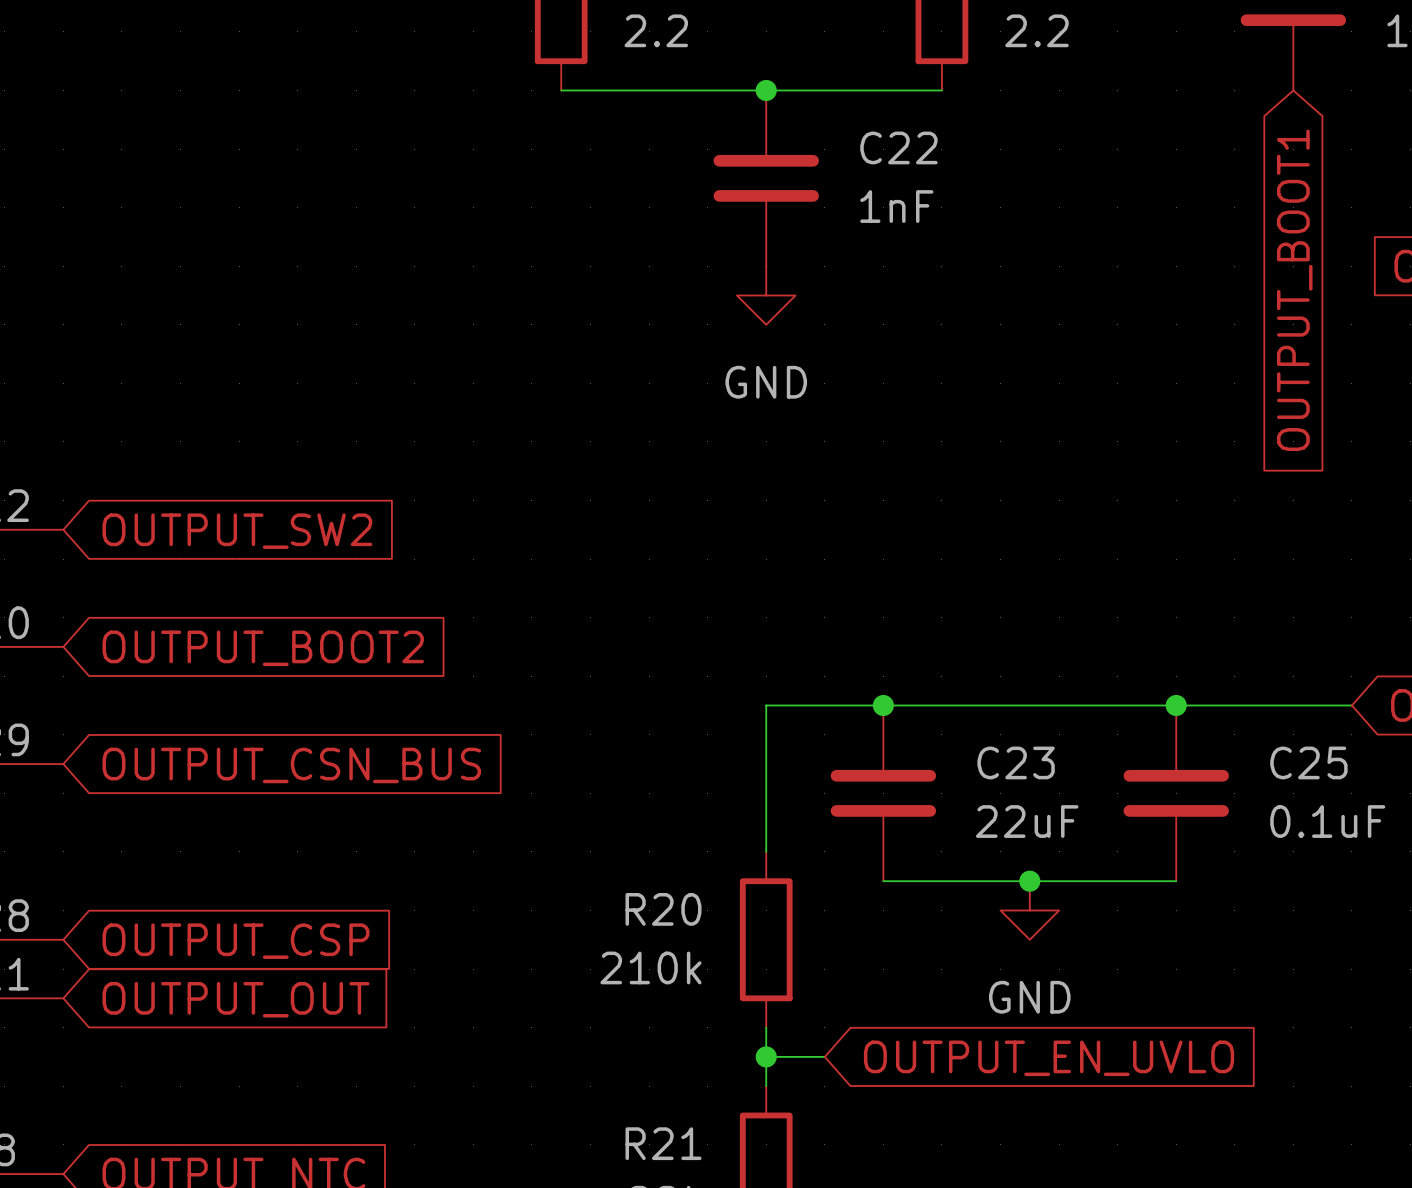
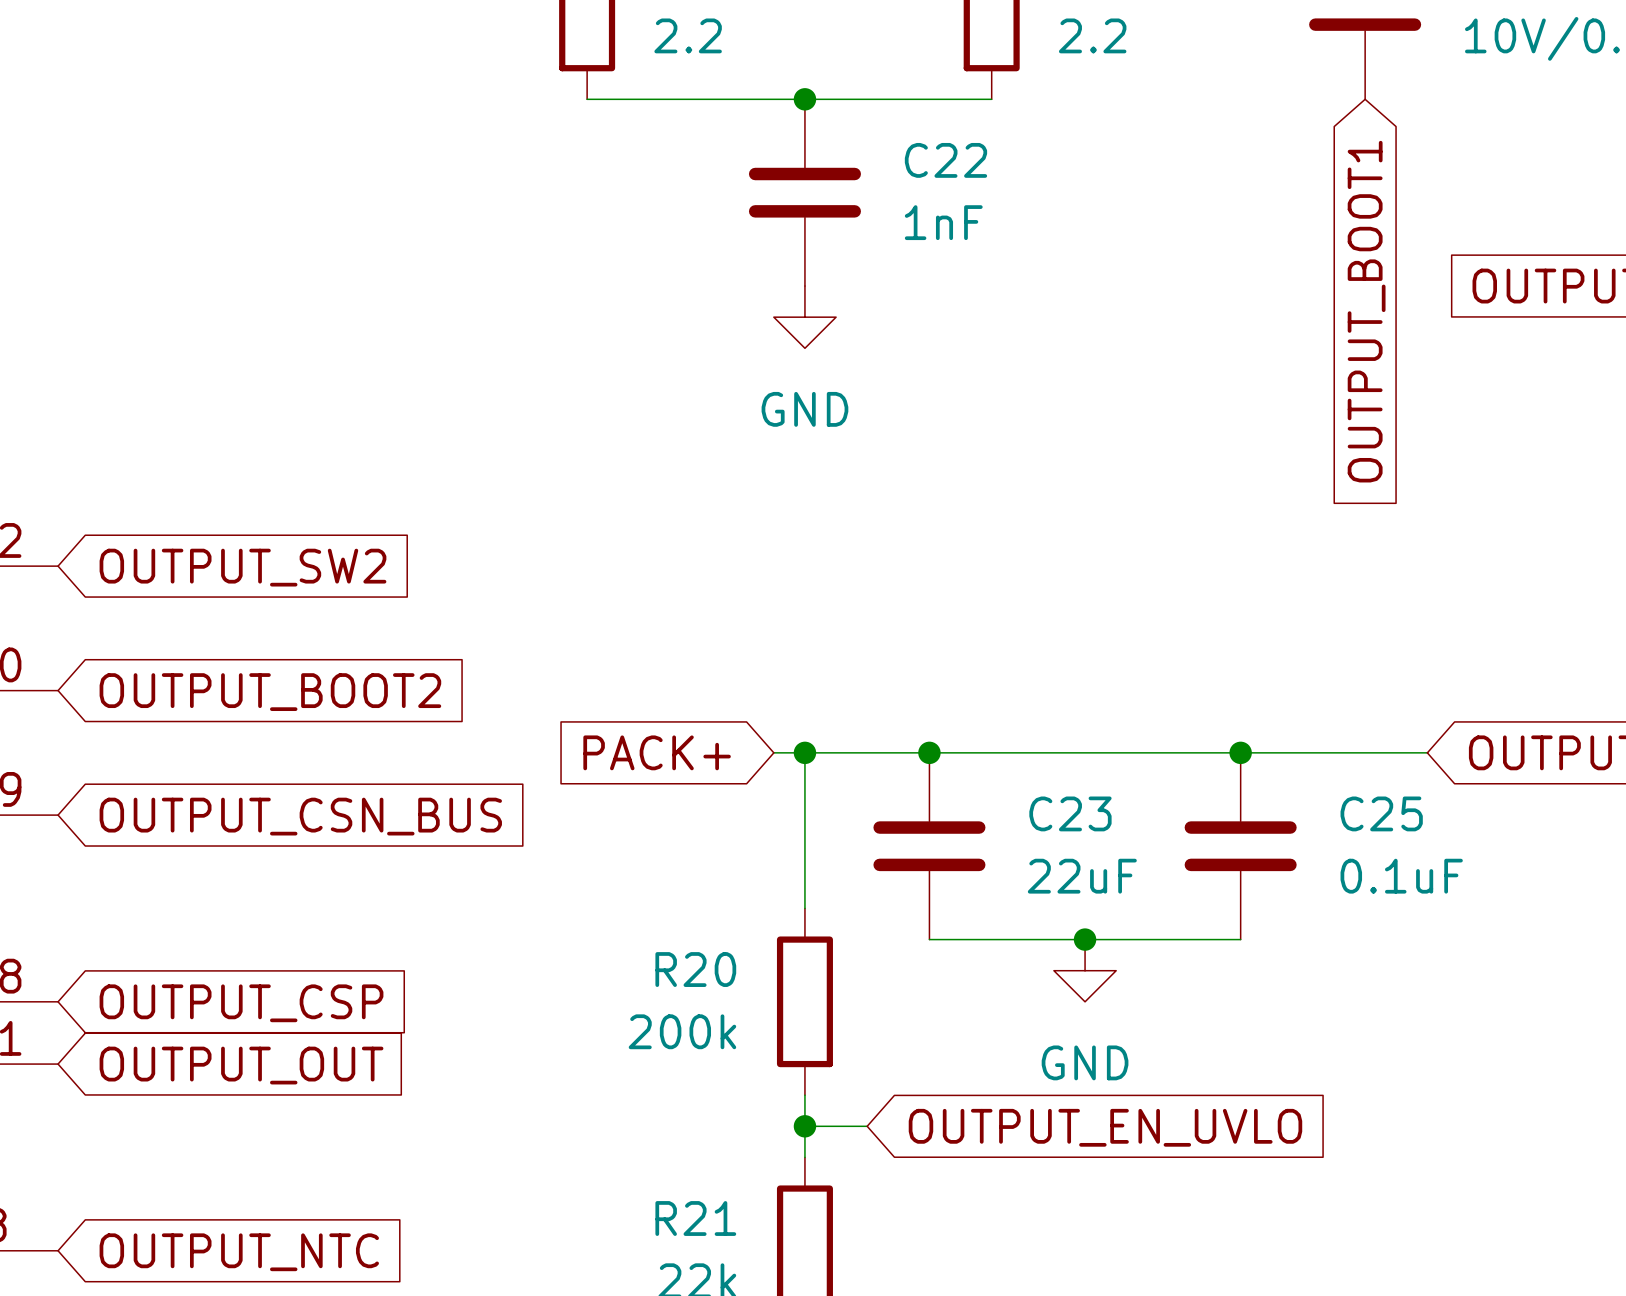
global label: none -> PACK+ (657, 752)
wire: none -> (773, 752) (804, 752)
junction: none -> (804, 752)
R20 value: 210k (650, 967) -> 200k (682, 1031)

